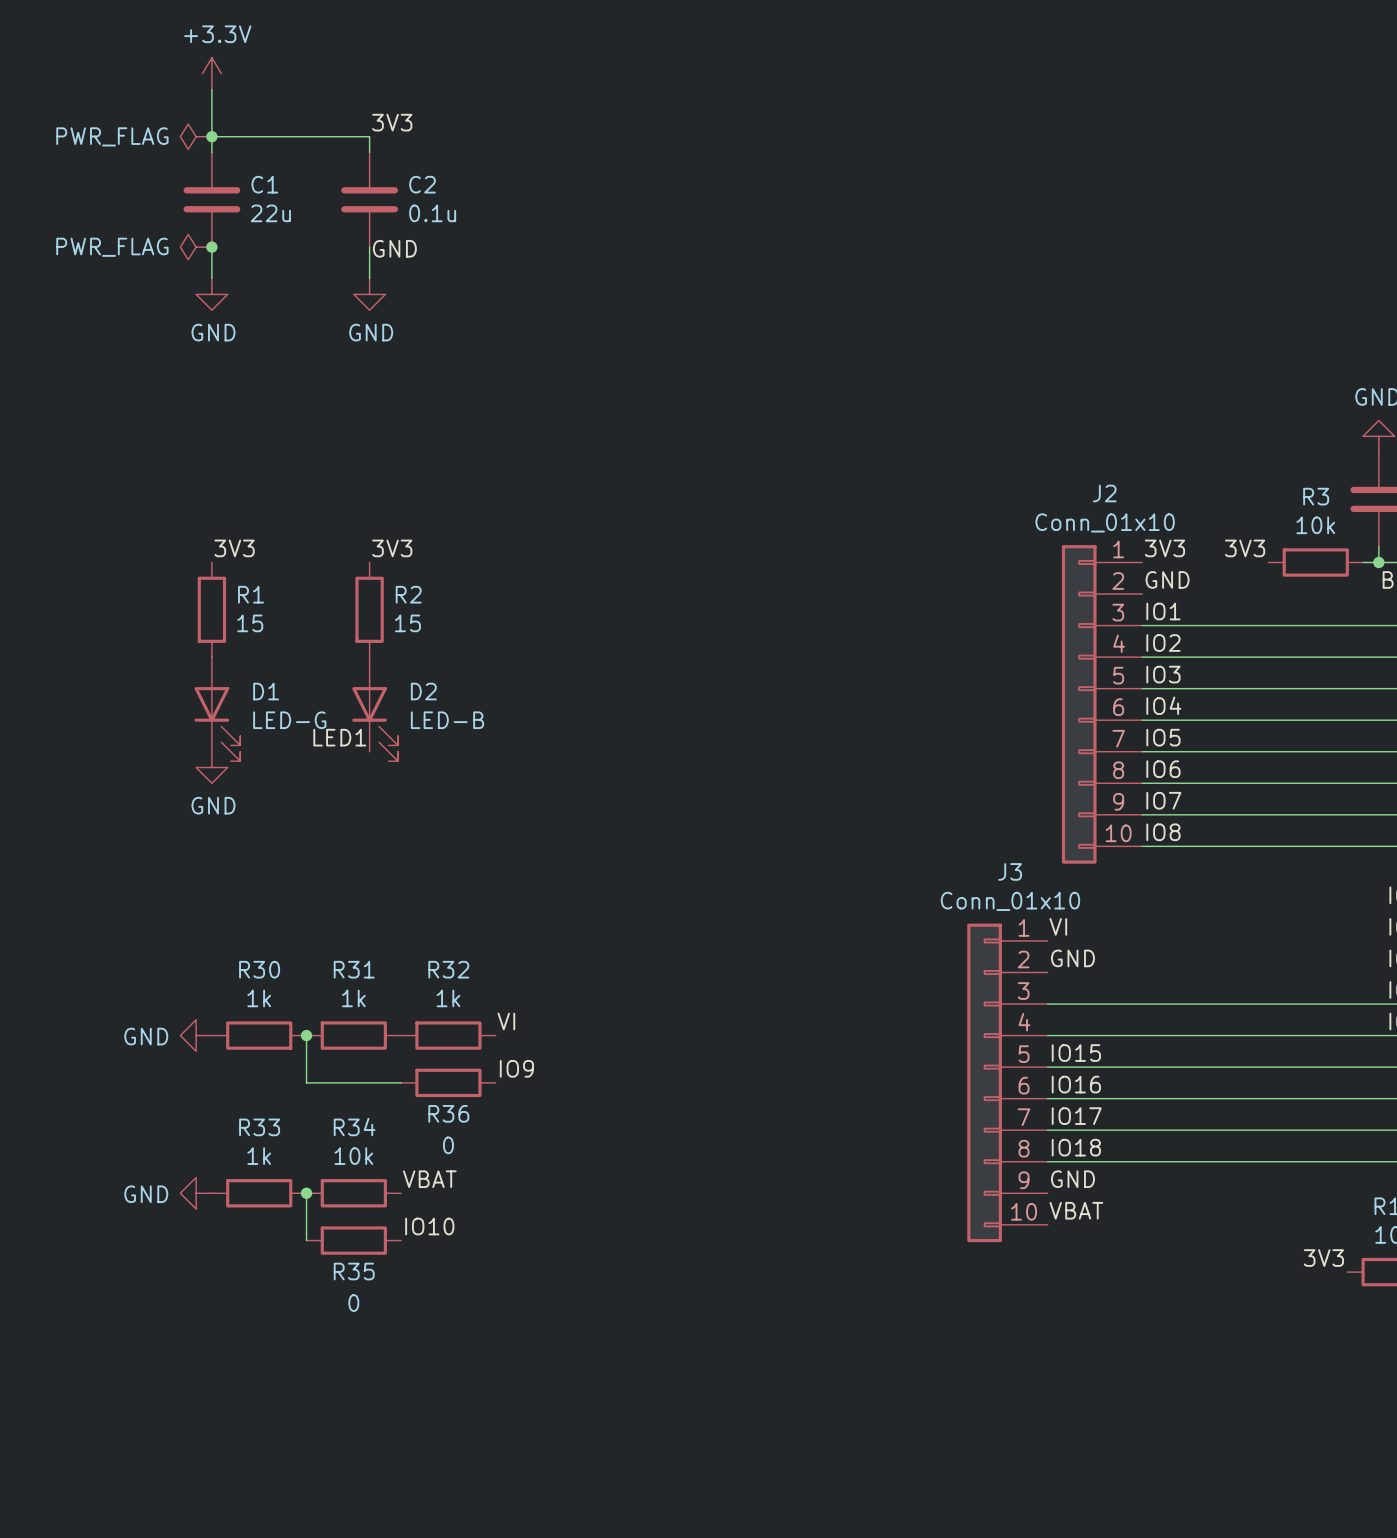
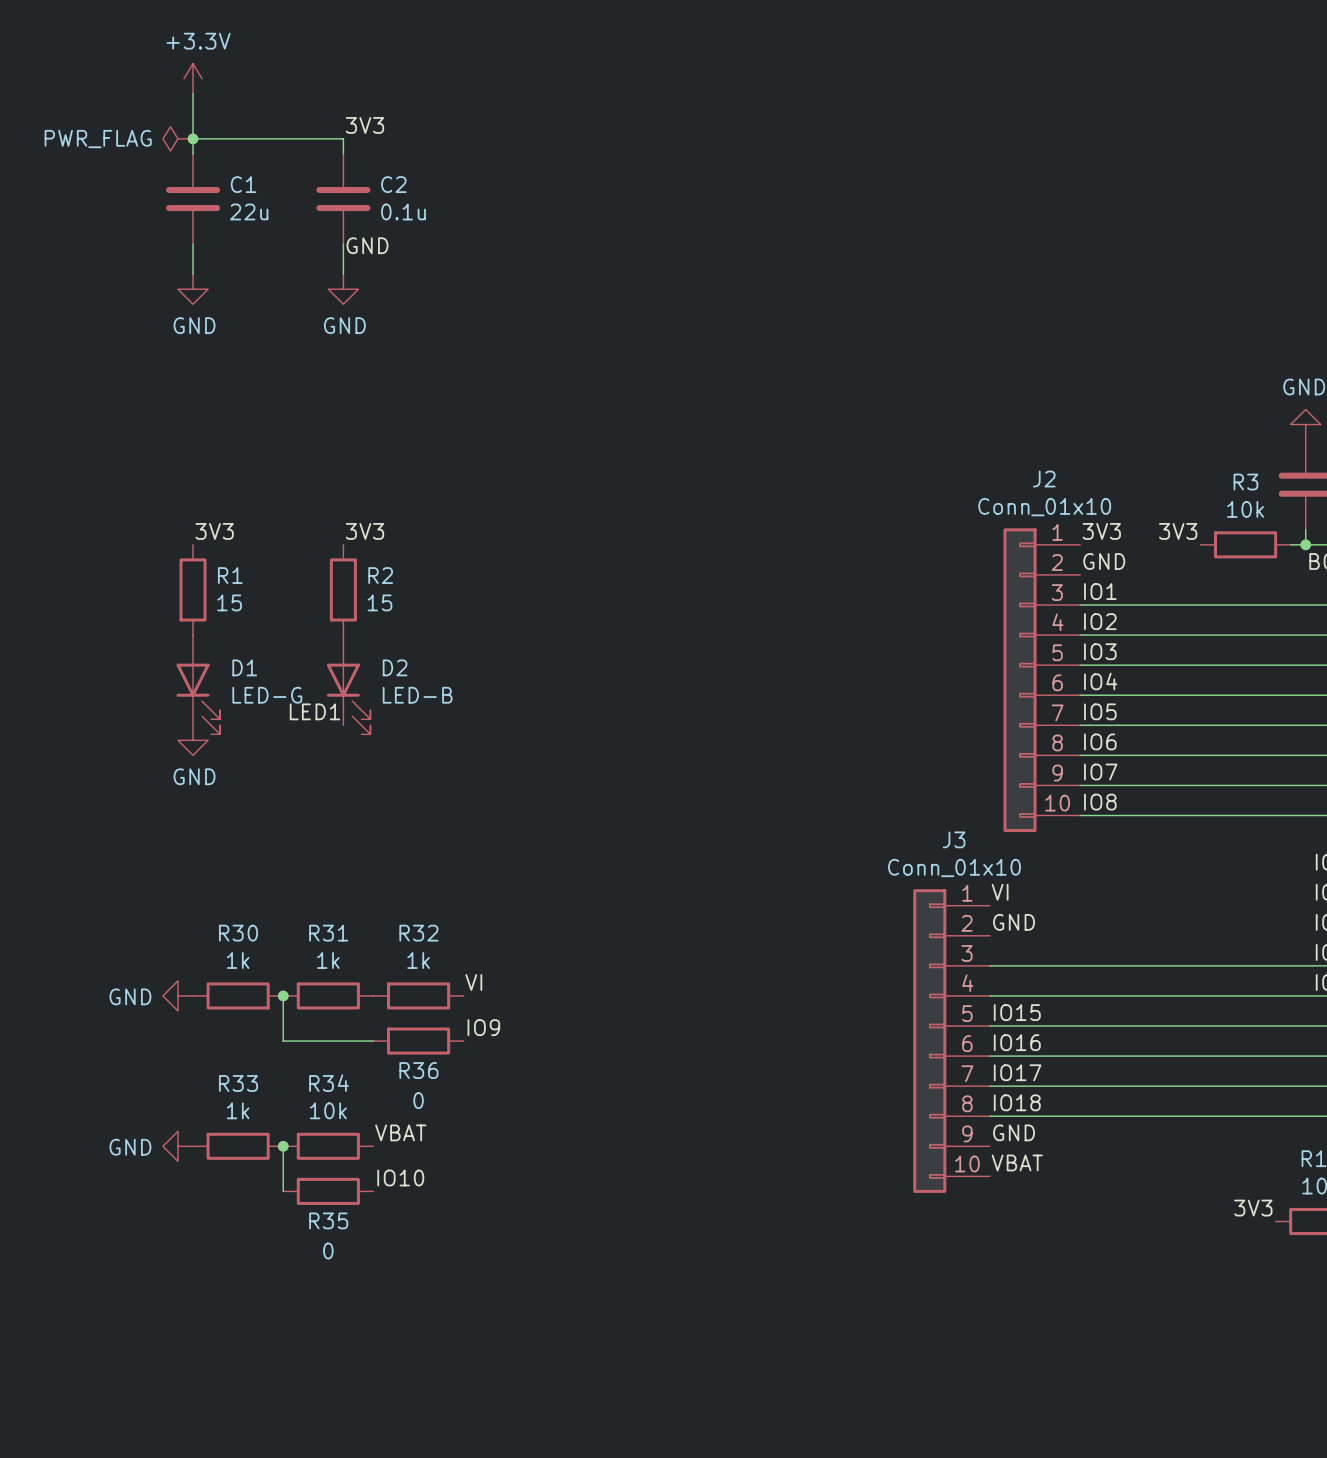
power symbol: PWR_FLAG (196, 247) -> none
junction: (211, 247) -> none

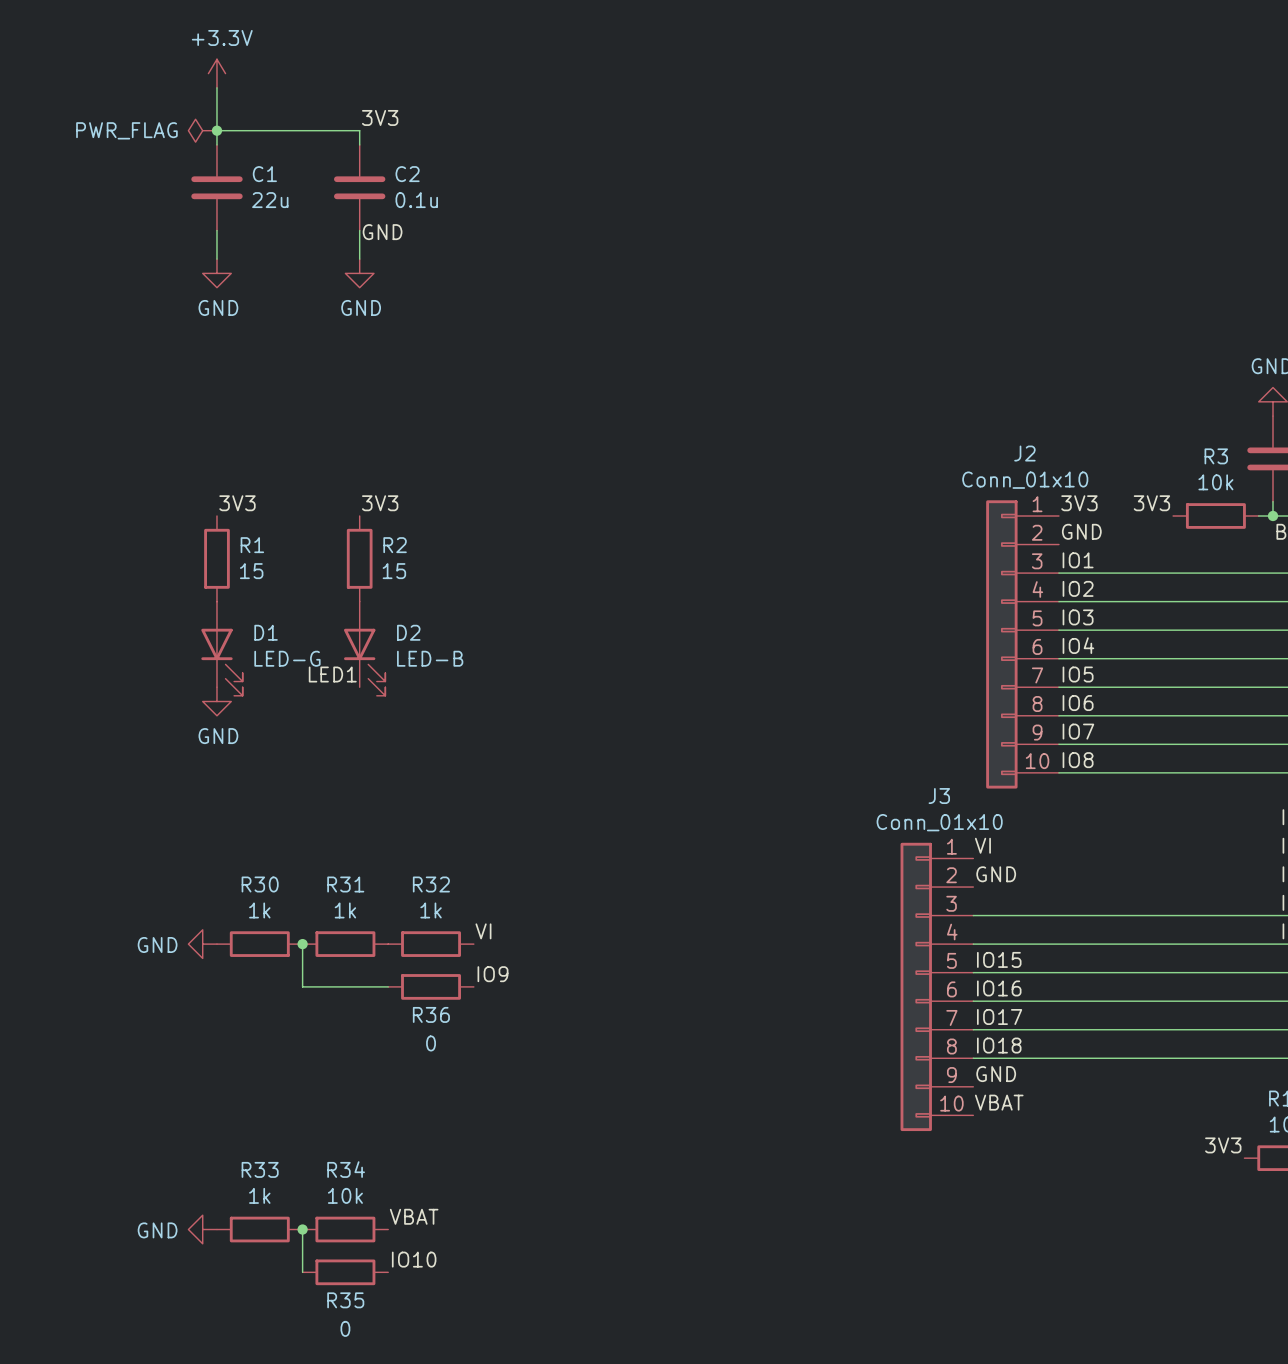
label position: VBAT (400, 1132) -> VBAT (414, 1216)
power symbol position: GND (177, 1146) -> GND (202, 1229)
R33 position: (238, 1146) -> (259, 1229)
wire: (283, 1146) (283, 1191) -> (302, 1229) (302, 1272)
junction: (283, 1146) -> none
R34 position: (328, 1146) -> (345, 1229)
label position: IO10 (400, 1177) -> IO10 (414, 1259)
R35 position: (328, 1191) -> (345, 1272)
junction: none -> (302, 1229)

